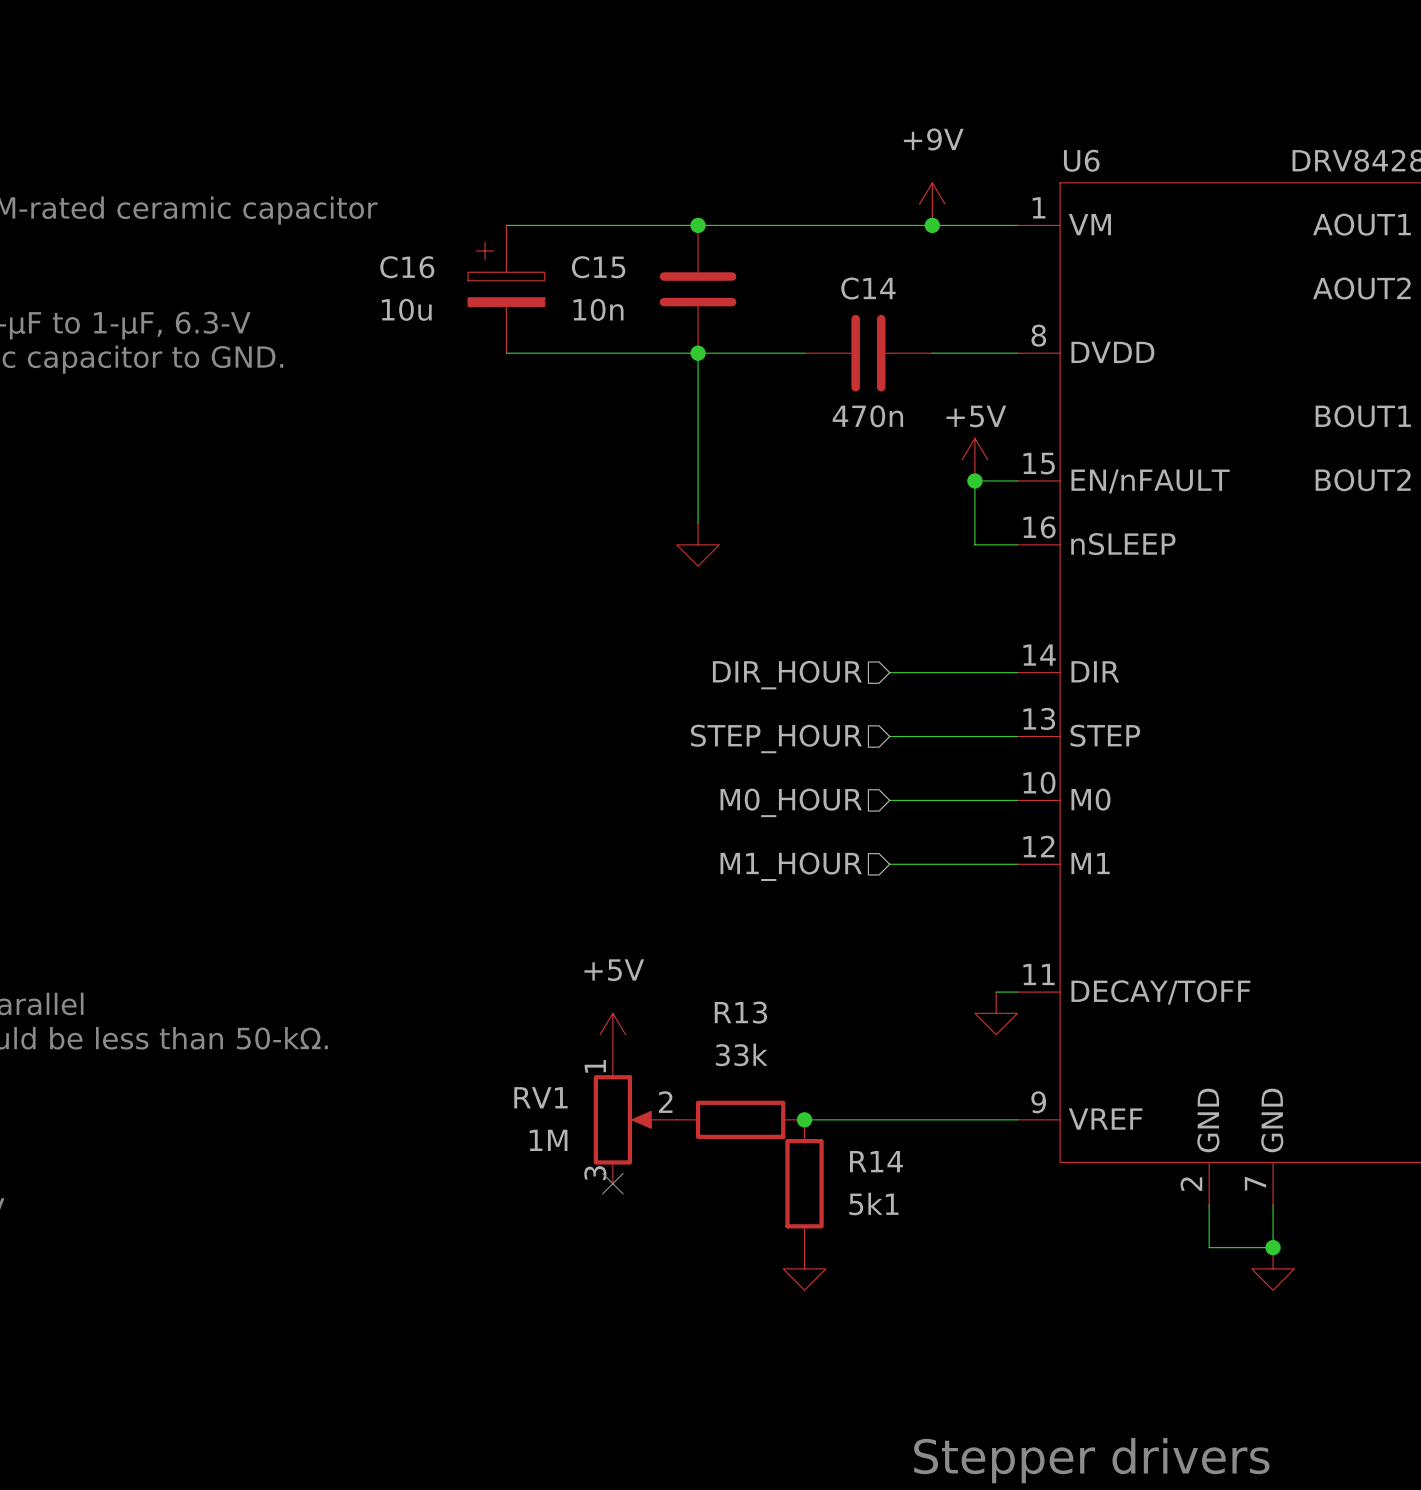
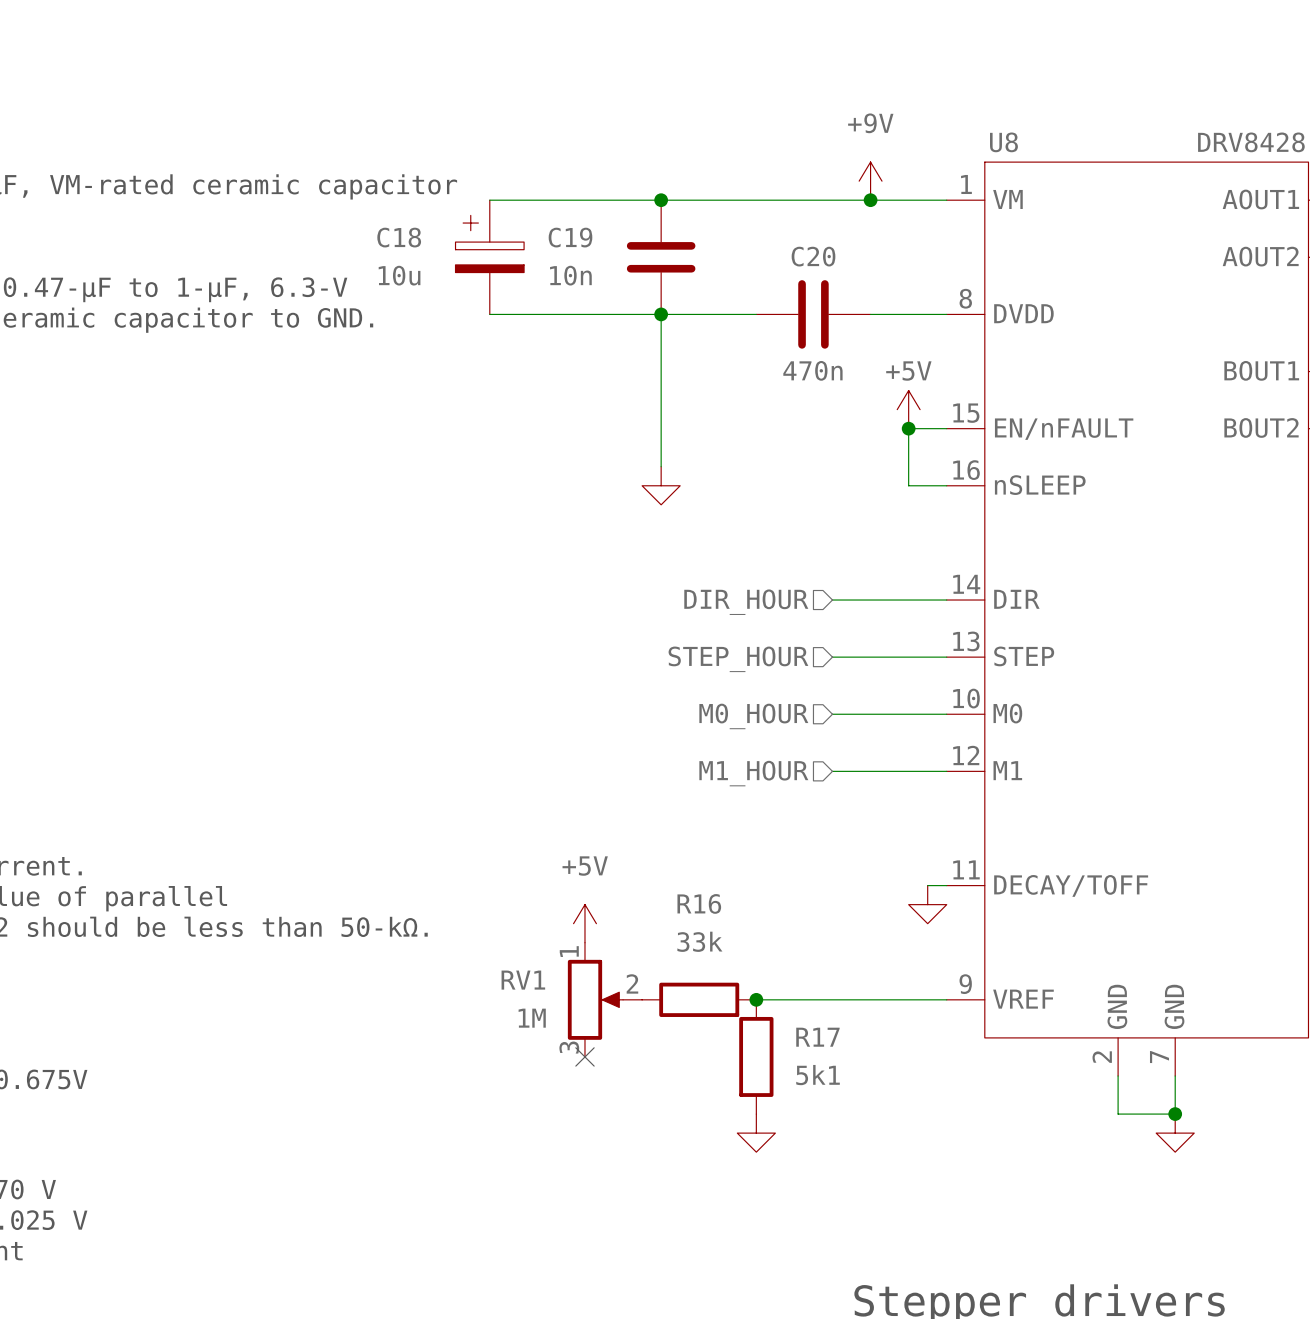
U6 name: U6 (1081, 160) -> U8 (1003, 142)
C16 name: C16 (407, 267) -> C18 (399, 237)
C15 name: C15 (598, 267) -> C19 (570, 237)
C14 name: C14 (868, 288) -> C20 (813, 256)
R13 name: R13 (740, 1012) -> R16 (699, 903)
R14 name: R14 (876, 1161) -> R17 (817, 1037)

